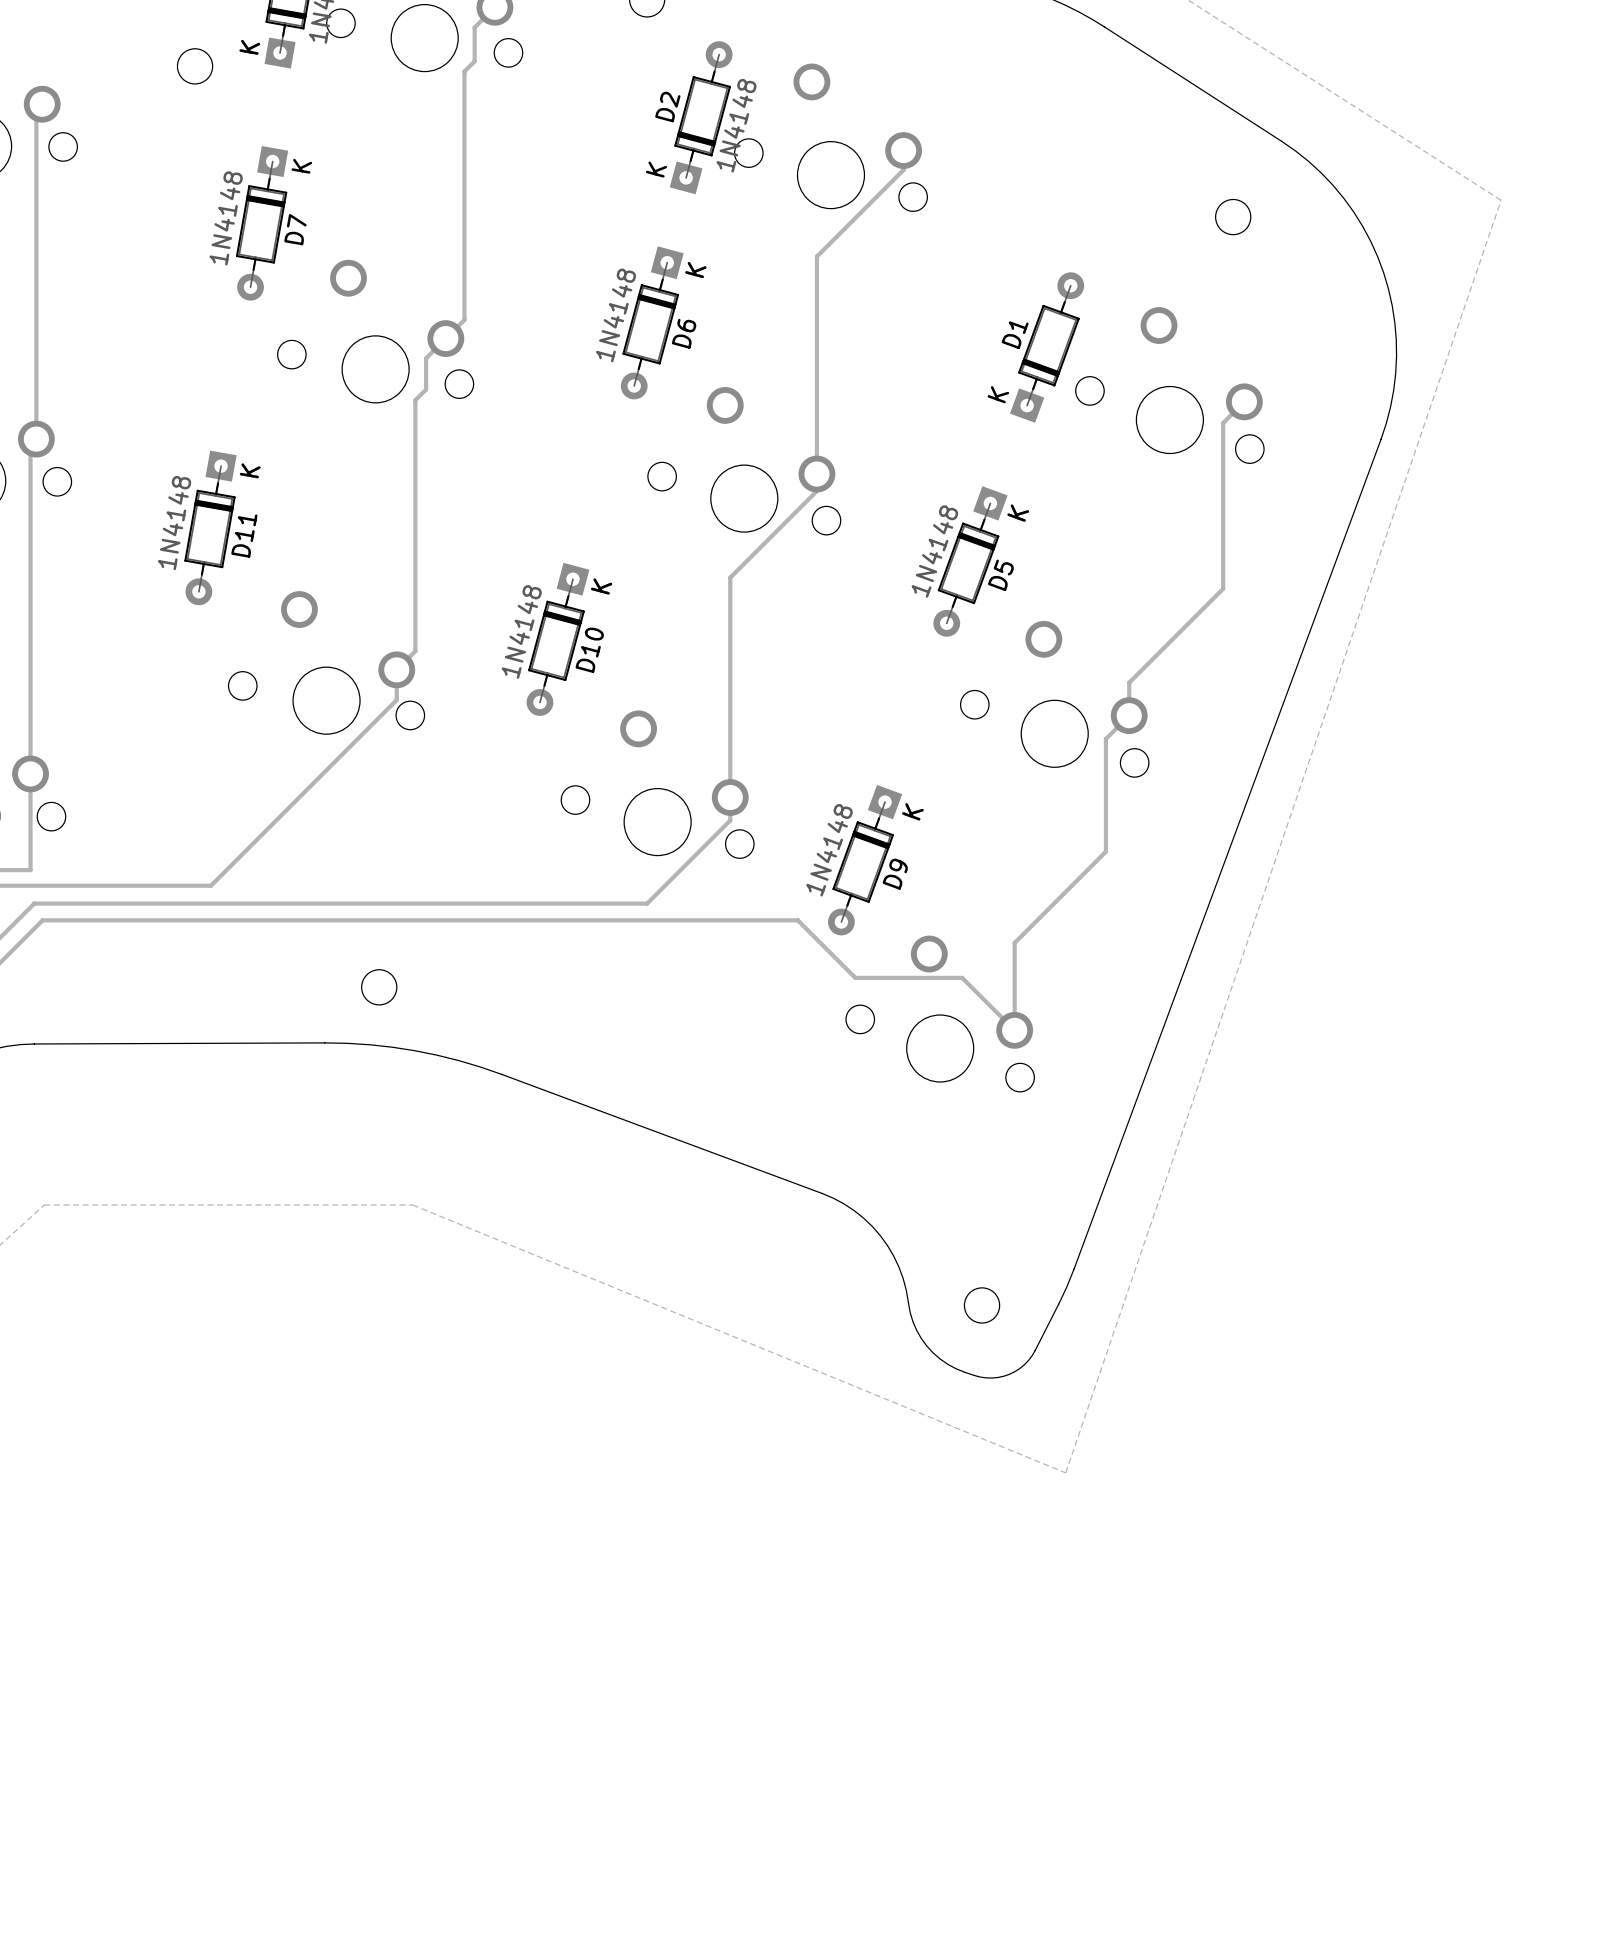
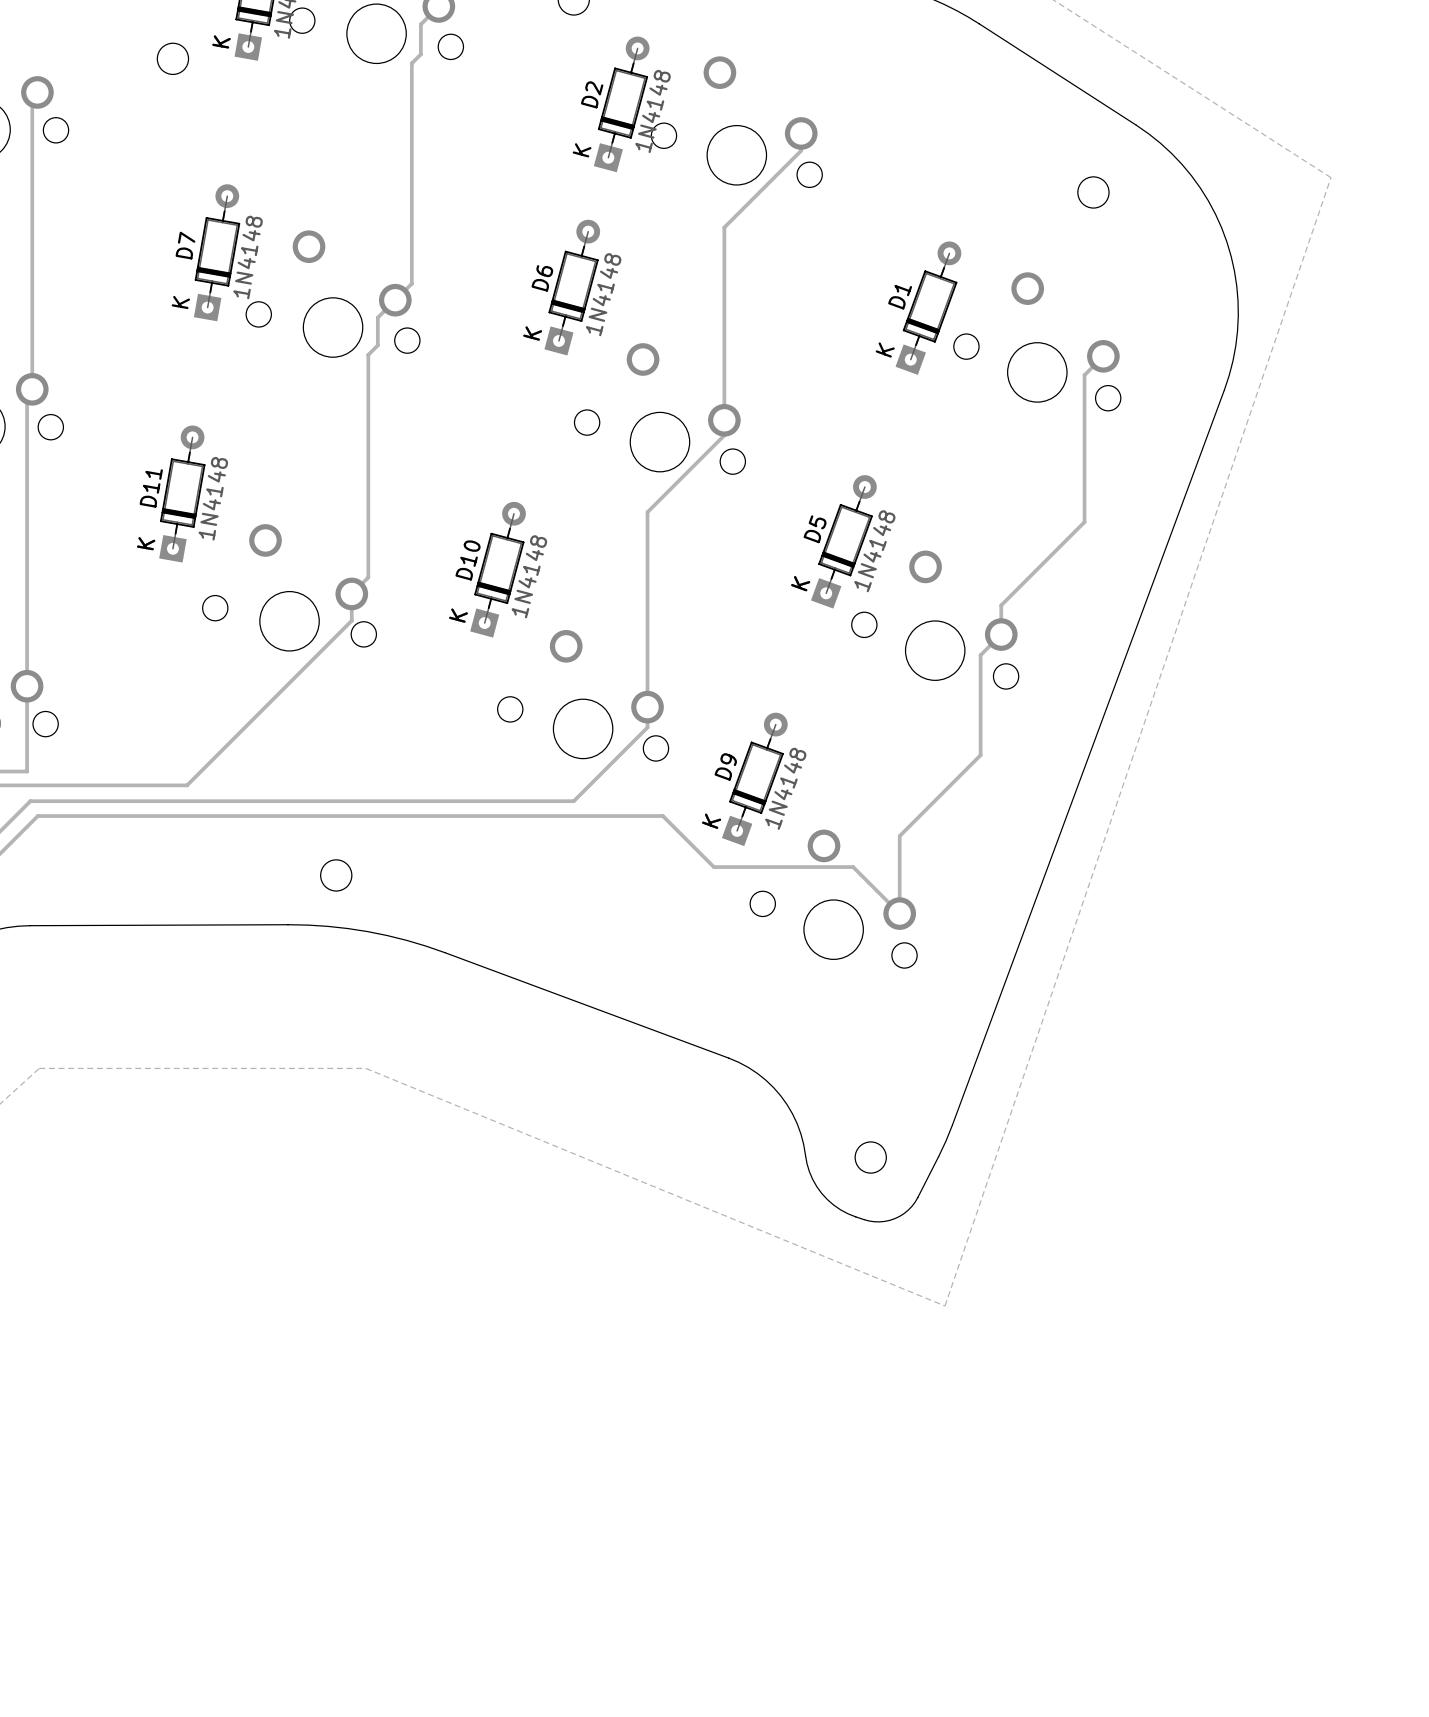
D7 rotation: 0° (262, 223) -> 180° (217, 252)
D6 rotation: 0° (652, 322) -> 180° (572, 287)
D11 rotation: 0° (210, 527) -> 180° (182, 494)
D5 rotation: 0° (970, 561) -> 180° (843, 541)
D10 rotation: 0° (557, 639) -> 180° (498, 569)
D9 rotation: 0° (865, 860) -> 180° (754, 779)
track: (747, 920) (797, 920) (855, 977) -> (662, 816) (713, 867) (758, 867)

